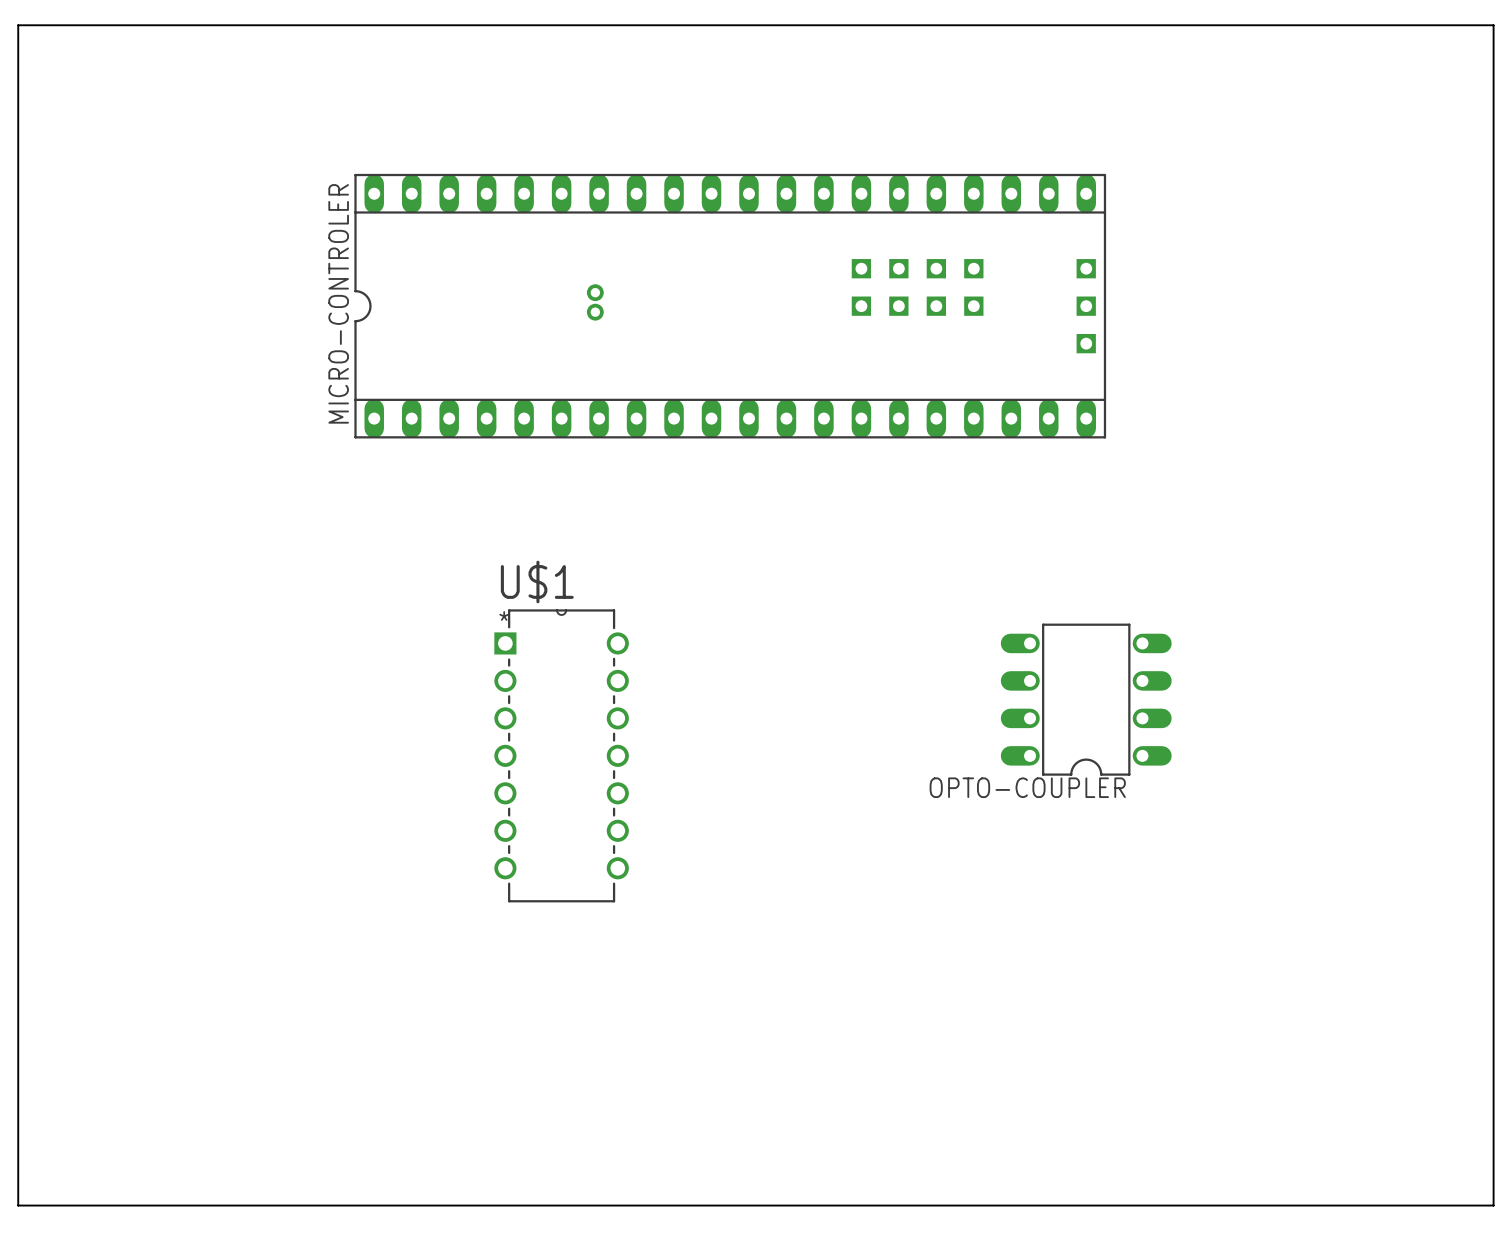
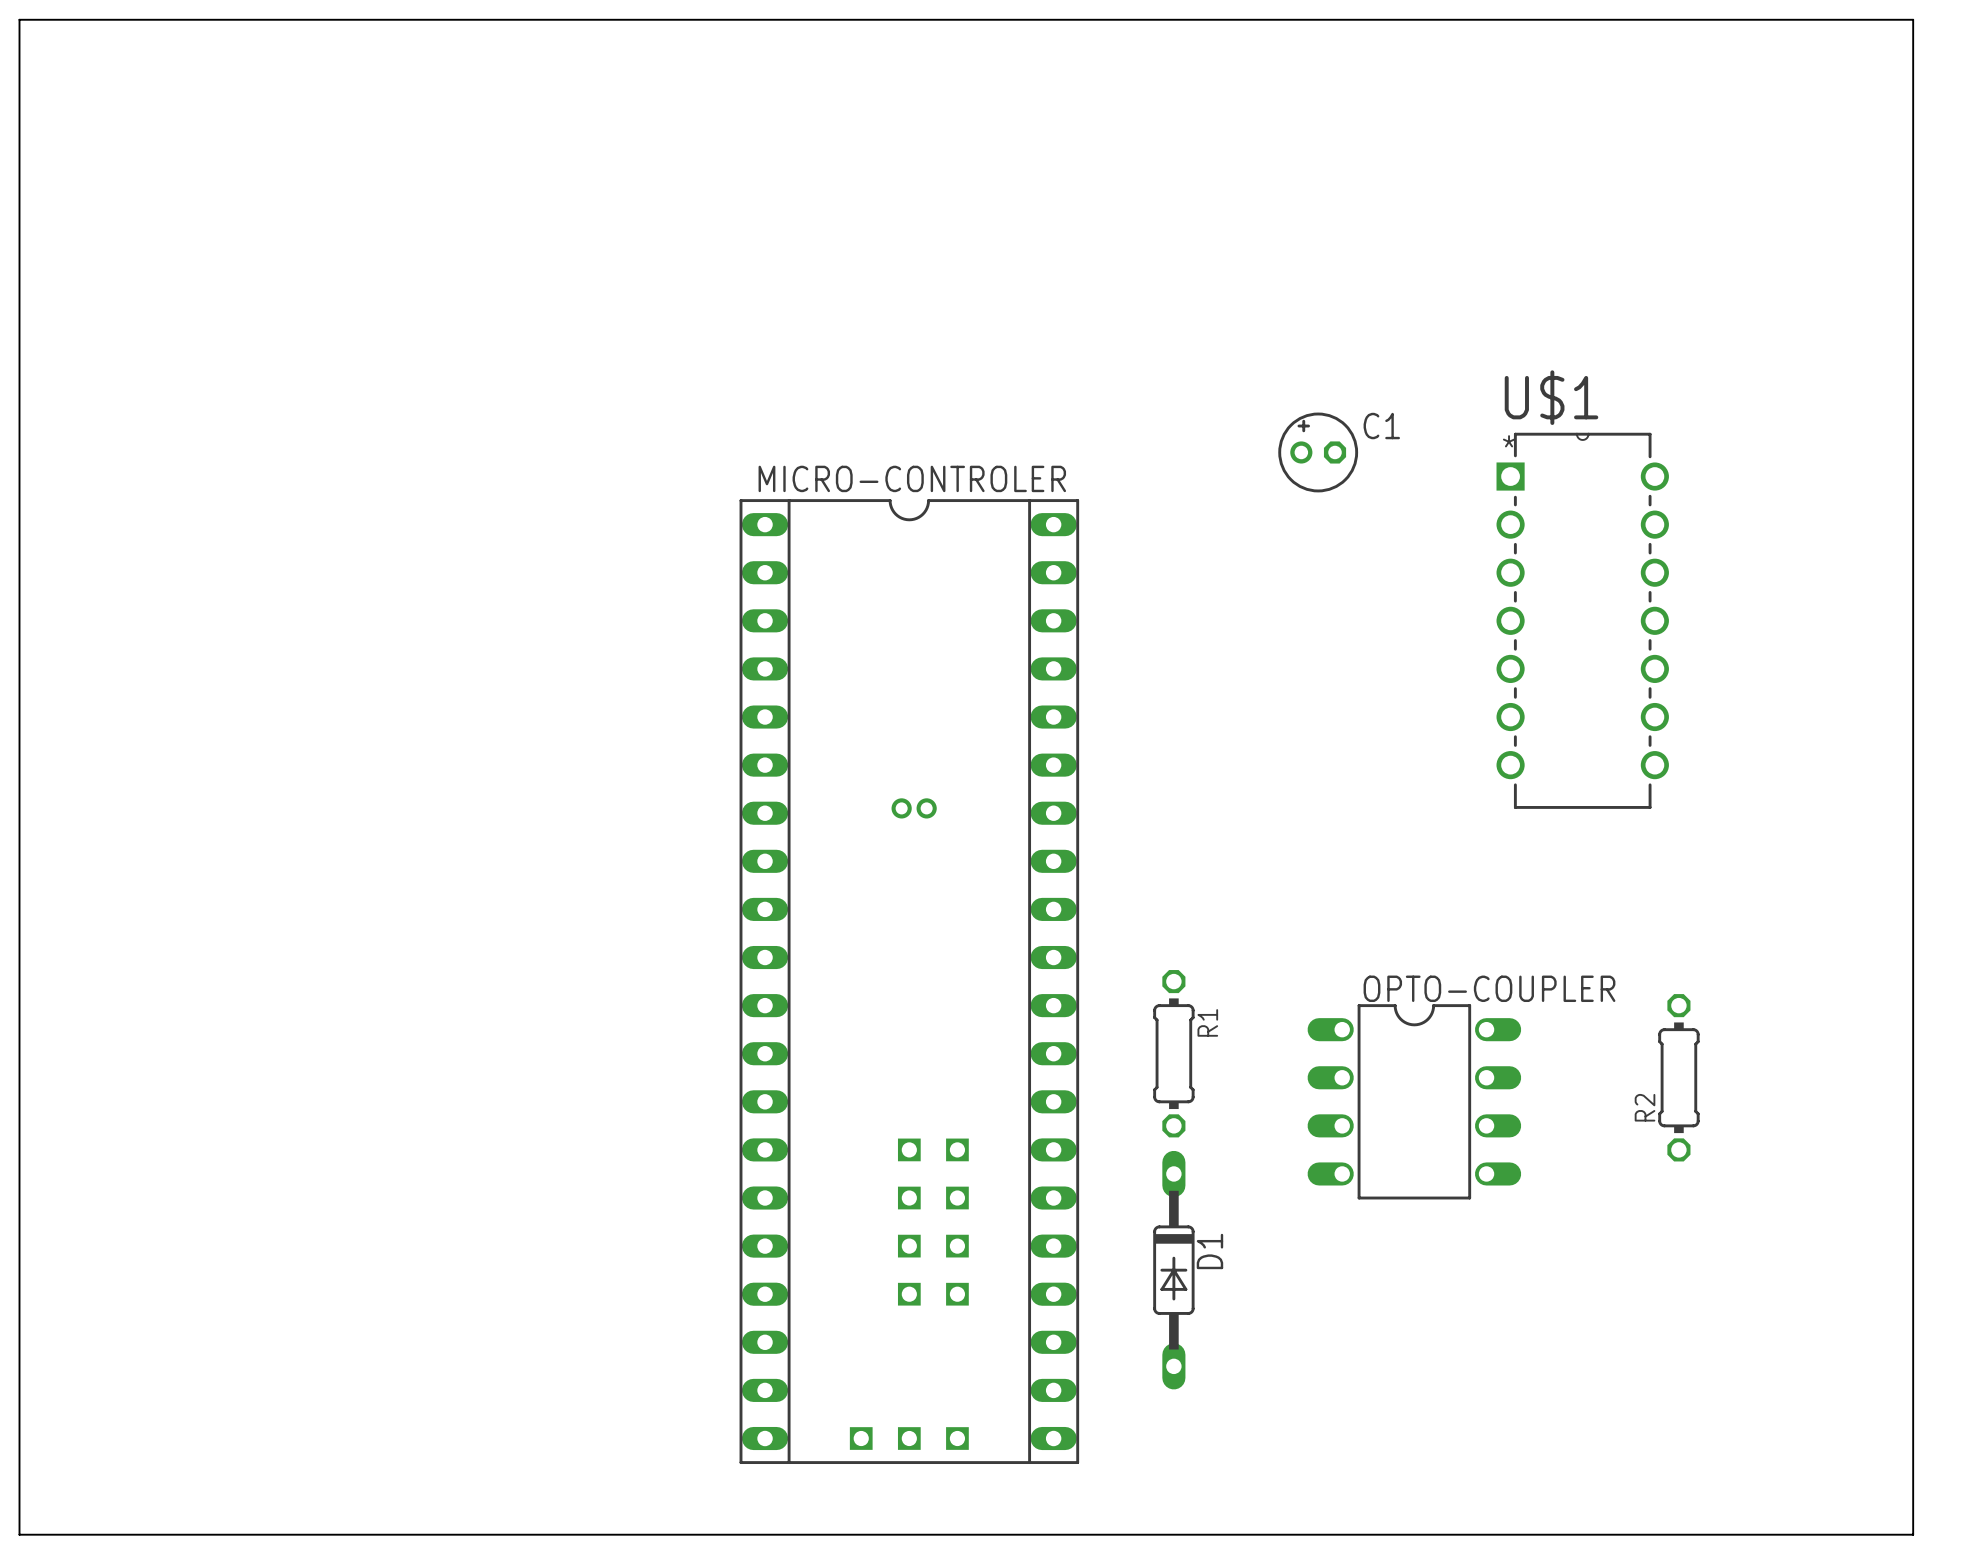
MICRO-CONTROLER: (730, 306) -> none
C1: none -> (1318, 452)
U$1 footprint: [494, 609, 629, 903] -> [1496, 432, 1669, 809]
OPTO-COUPLER: (1086, 699) -> none
MICRO-CONTROLER: none -> (909, 981)
R1: none -> (1173, 1053)
R2: none -> (1678, 1077)
OPTO-COUPLER: none -> (1414, 1101)
D1: none -> (1173, 1270)

